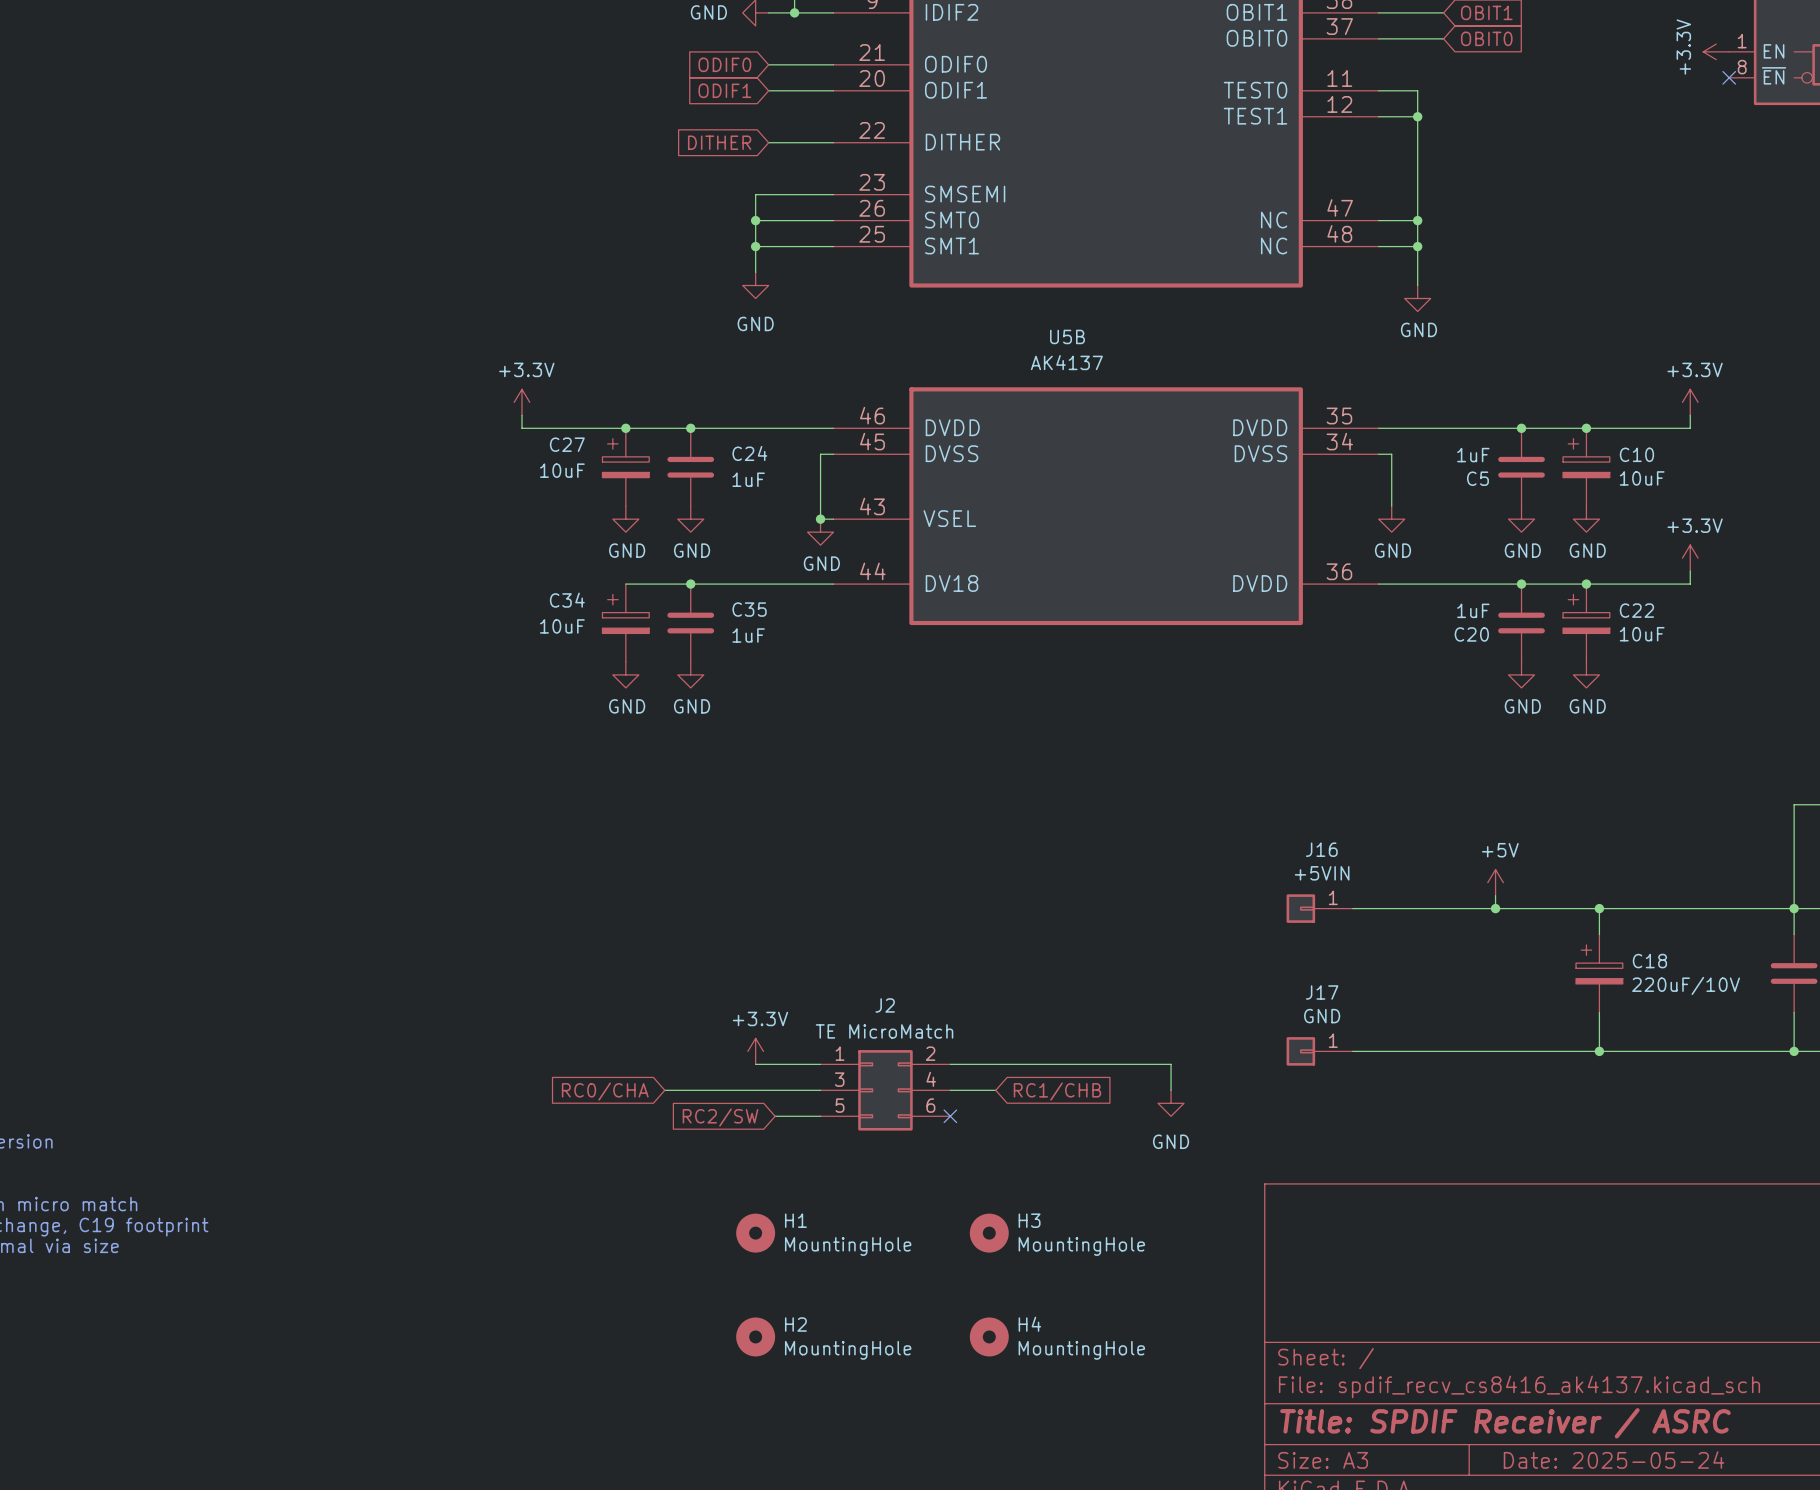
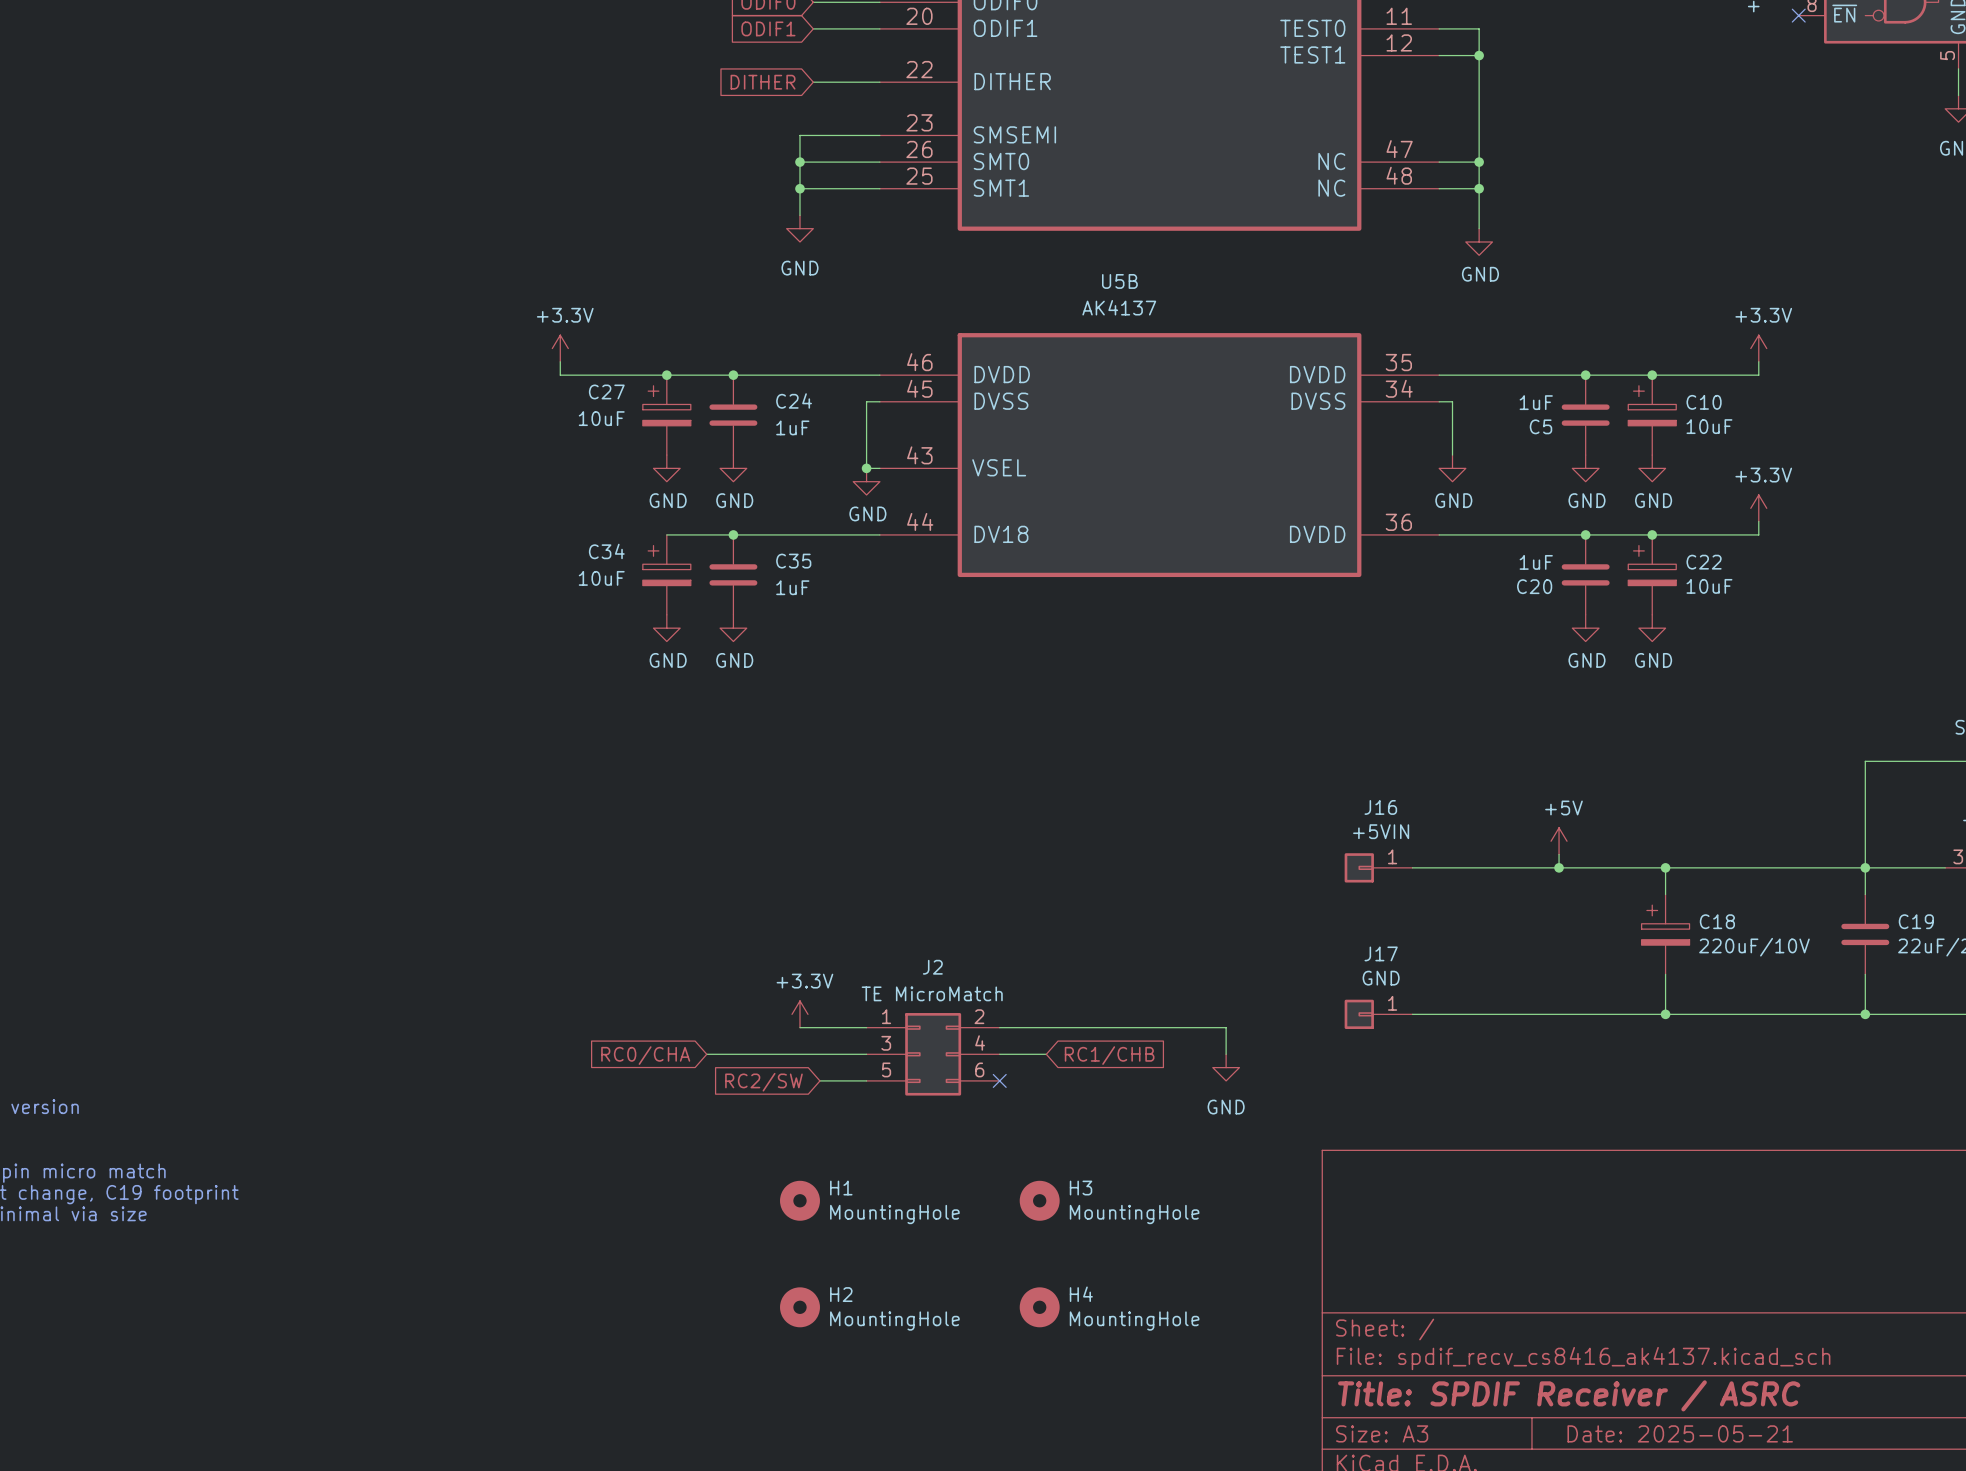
title block: Date: 2025-05-24 (1614, 1460) -> Date: 2025-05-21 (1680, 1433)

